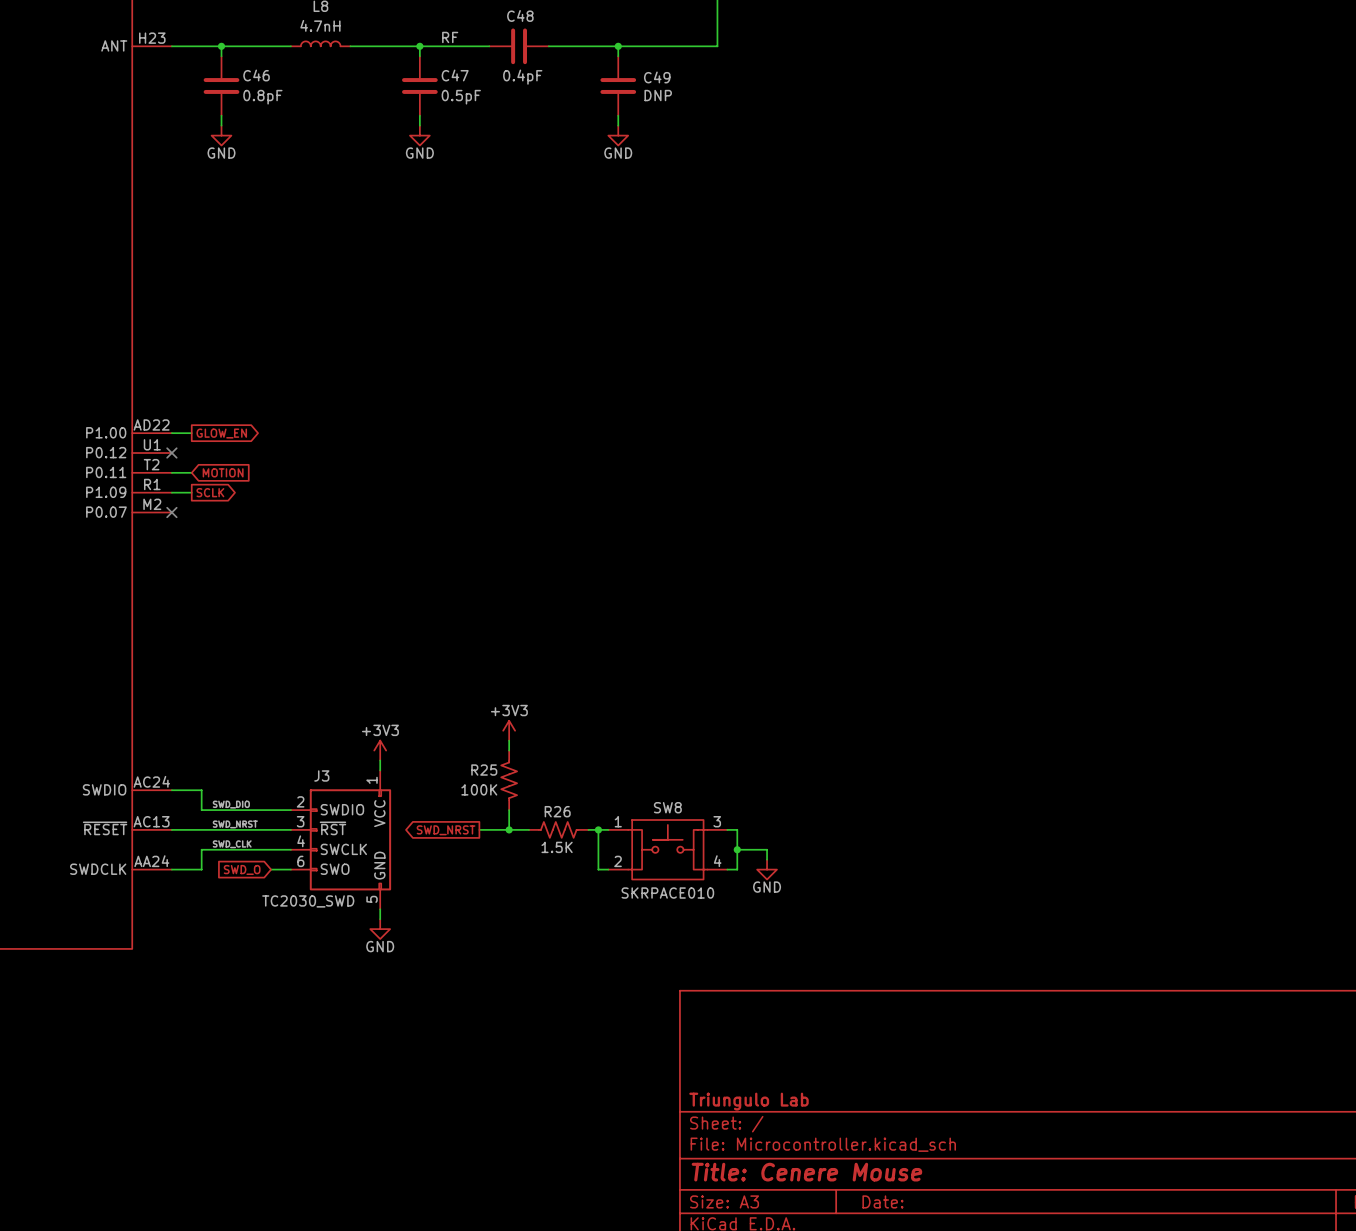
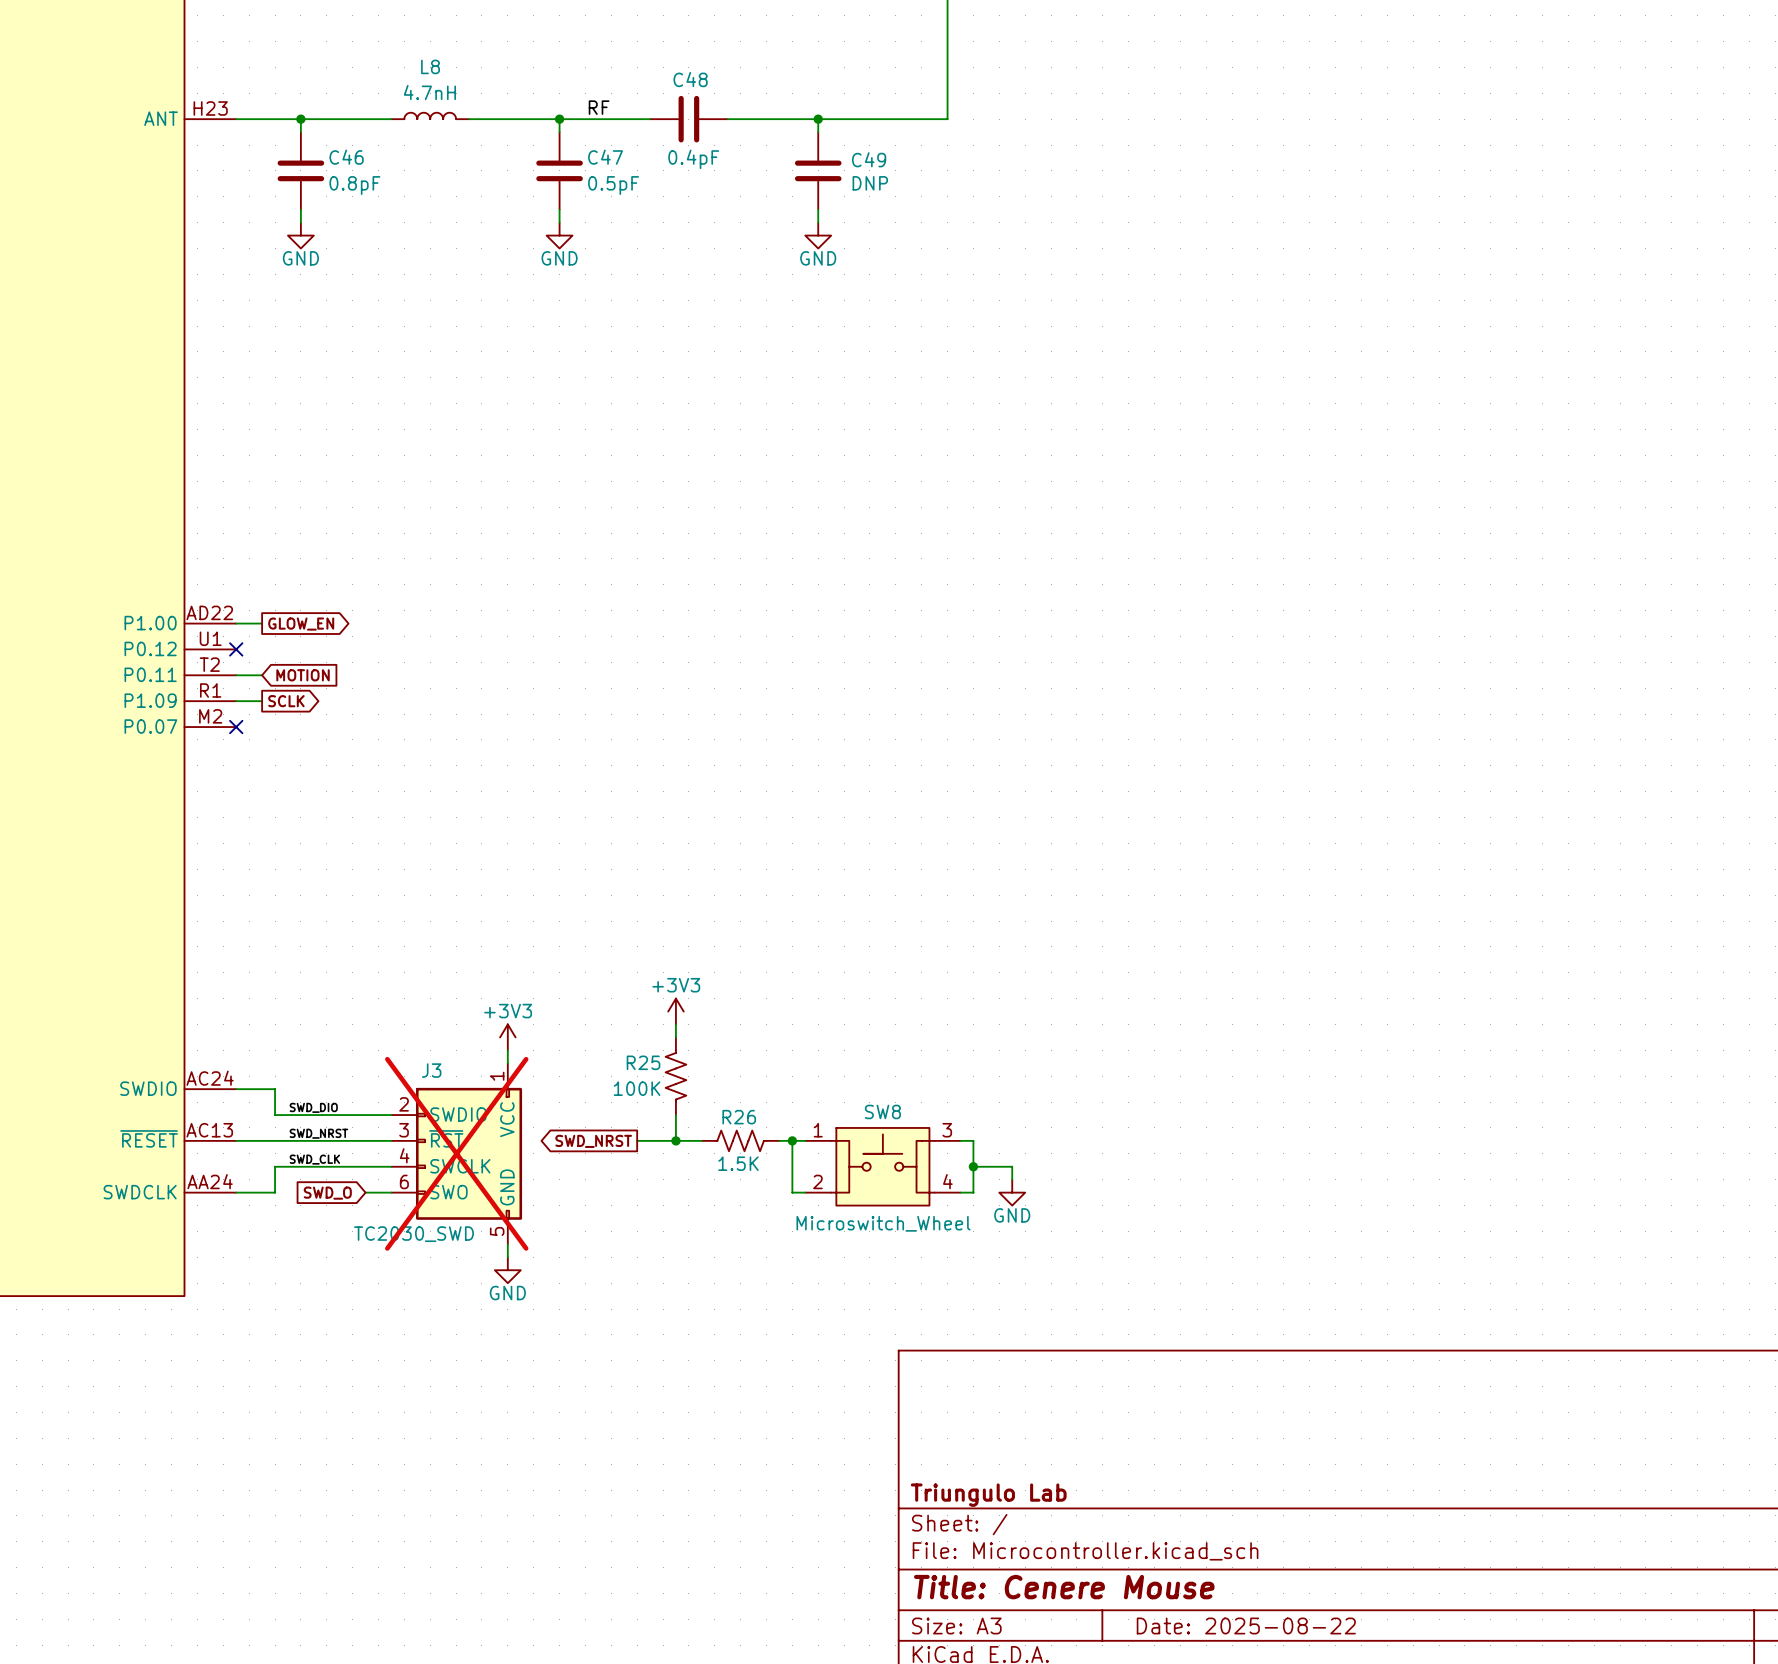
J3 do-not-place cross: none -> (456, 1153)
SW8 value: SKRPACE010 (667, 893) -> Microswitch_Wheel (883, 1223)
title block: Date: (882, 1201) -> Date: 2025-08-22 (1246, 1625)

